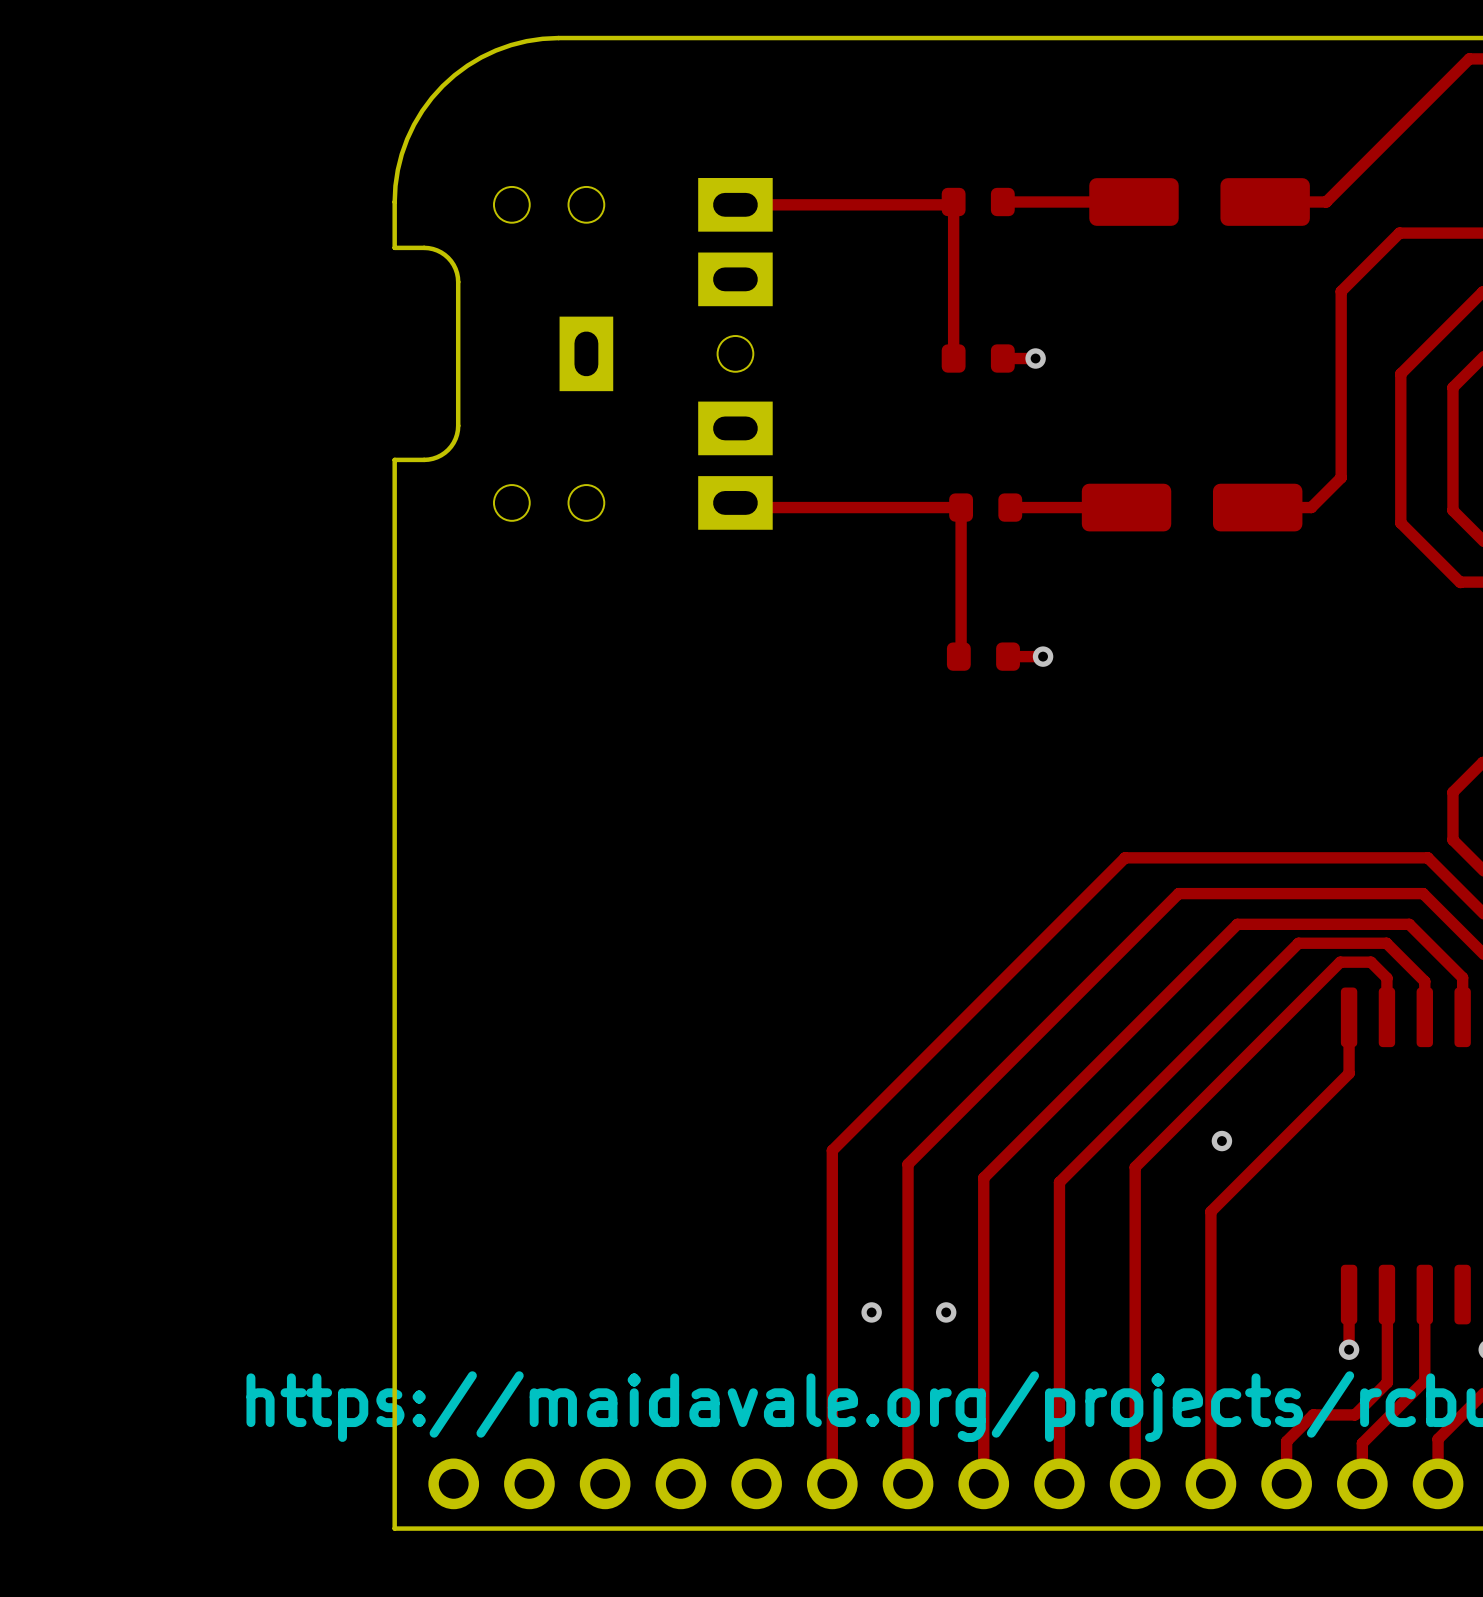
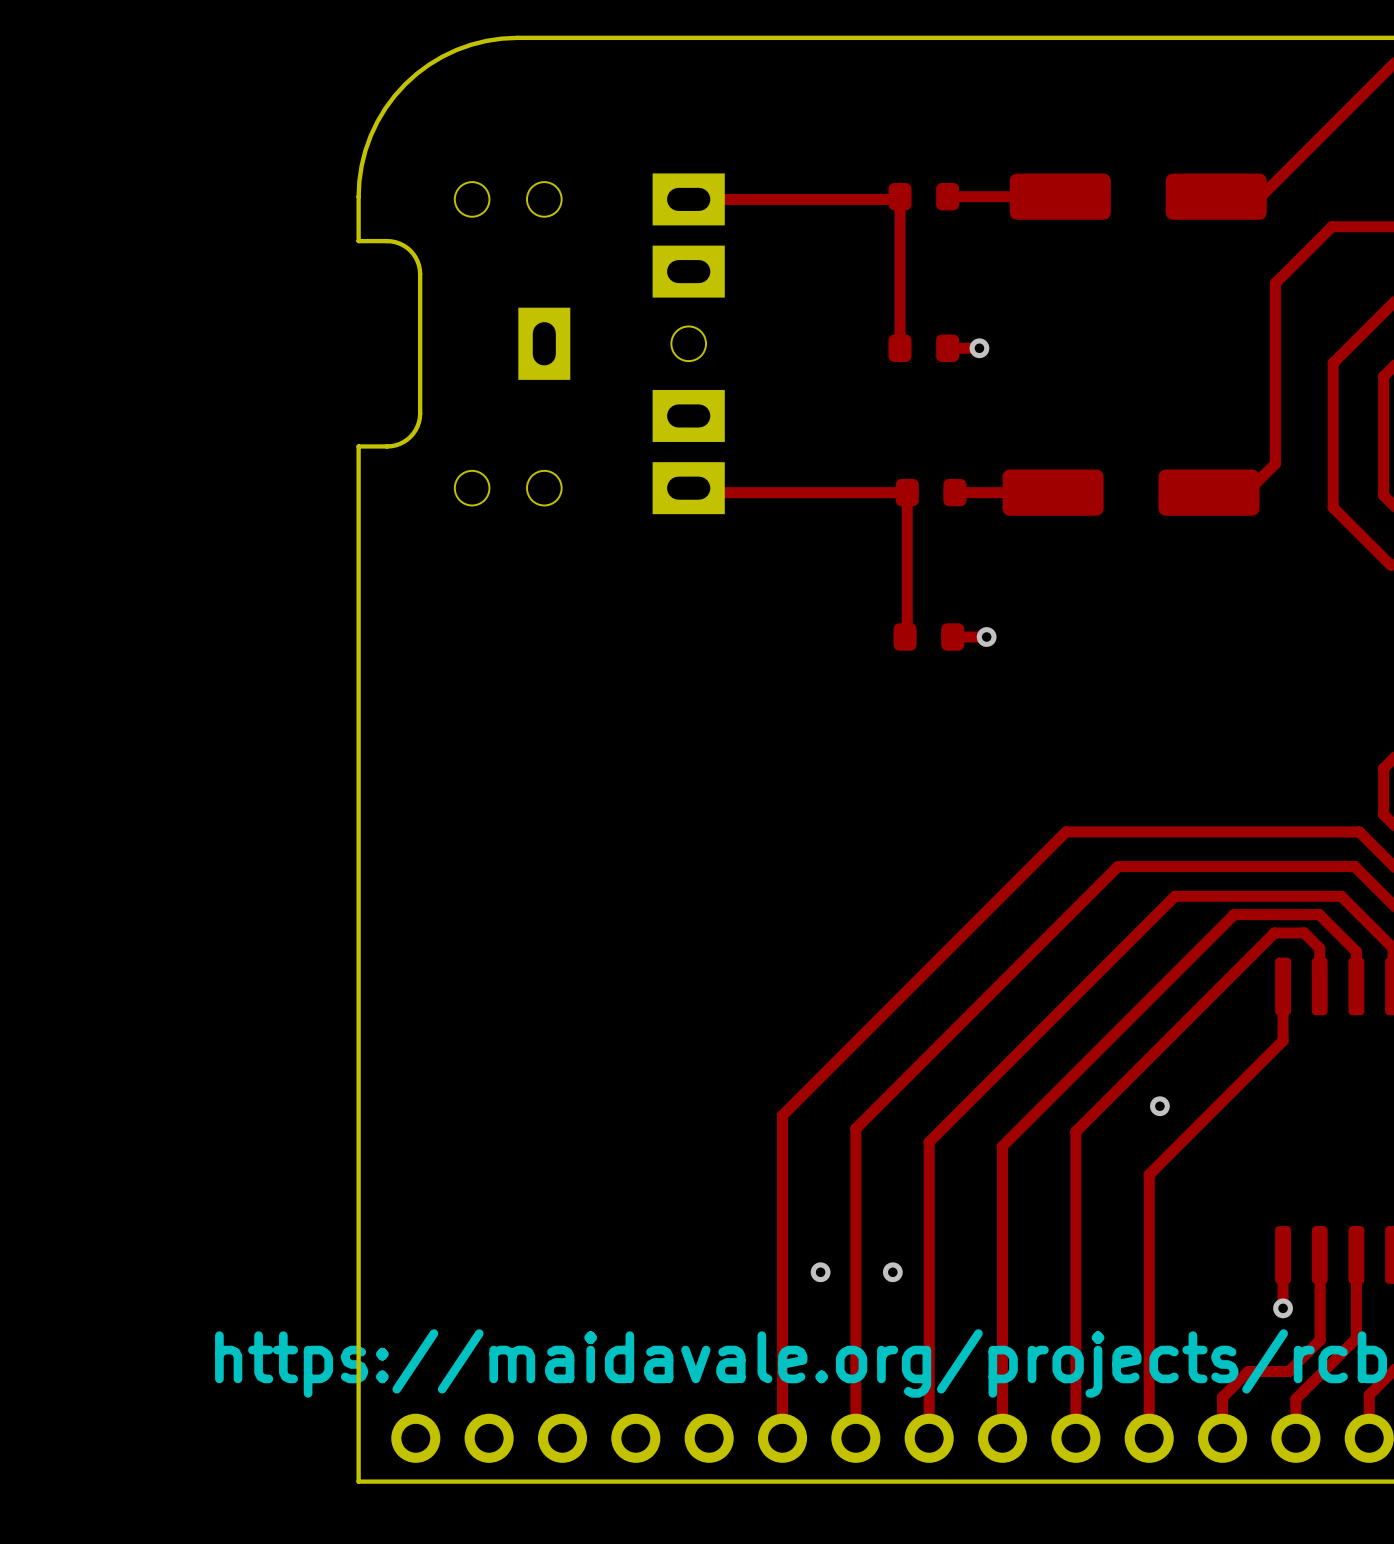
part footprint: [1089, 178, 1310, 226] -> [1009, 173, 1267, 220]
part footprint: [1081, 483, 1303, 532] -> [1002, 469, 1260, 516]

